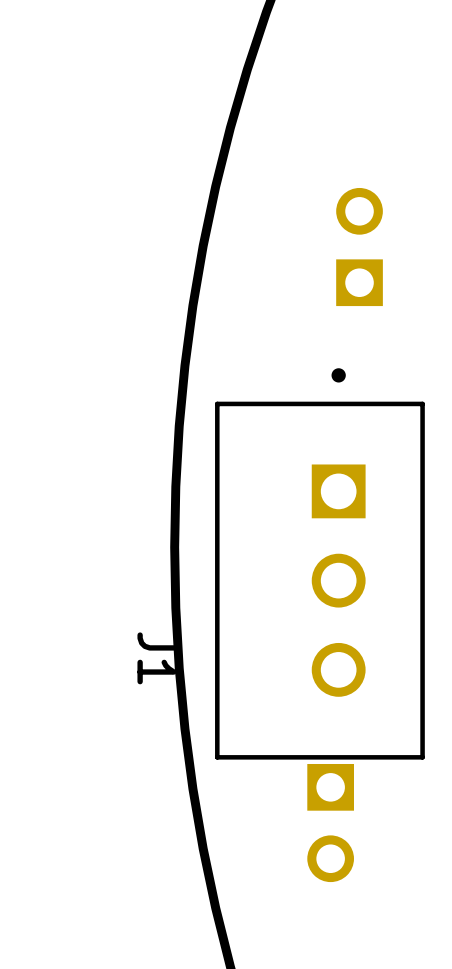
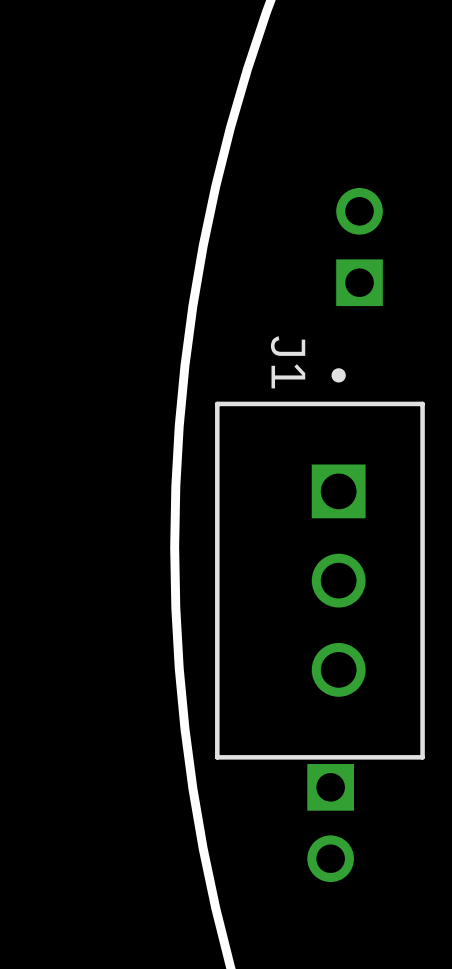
J1 name position: J1 (156, 658) -> J1 (288, 362)

